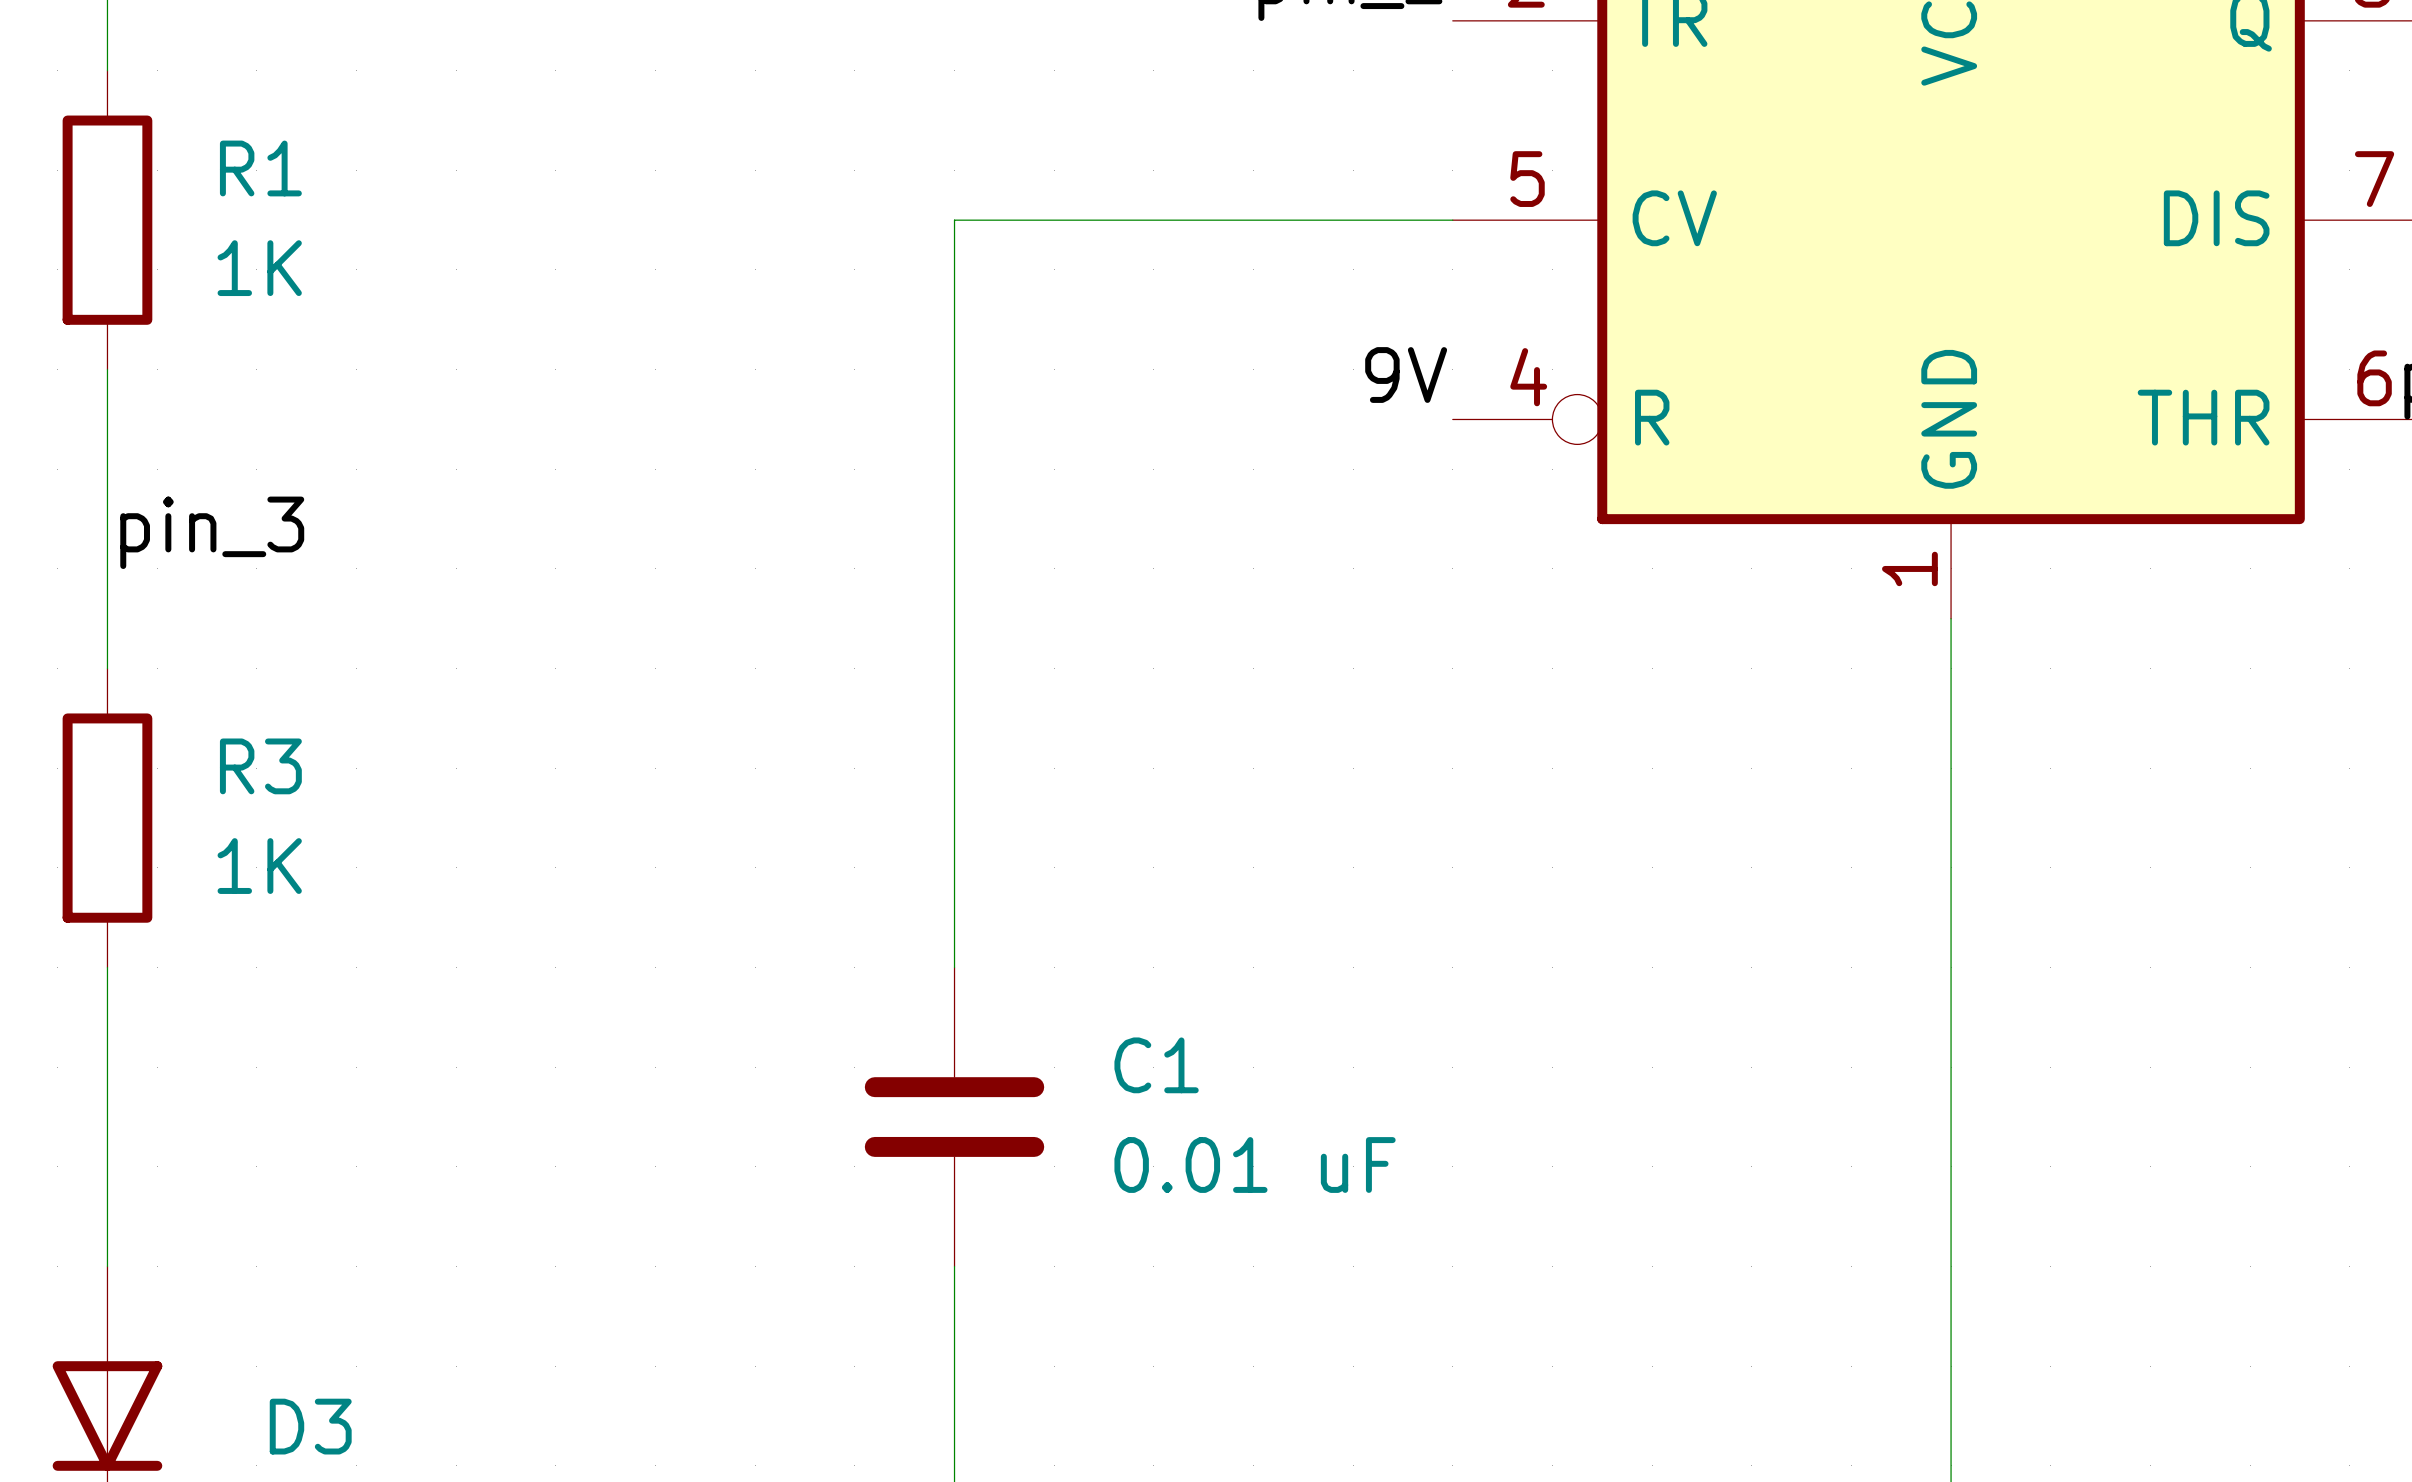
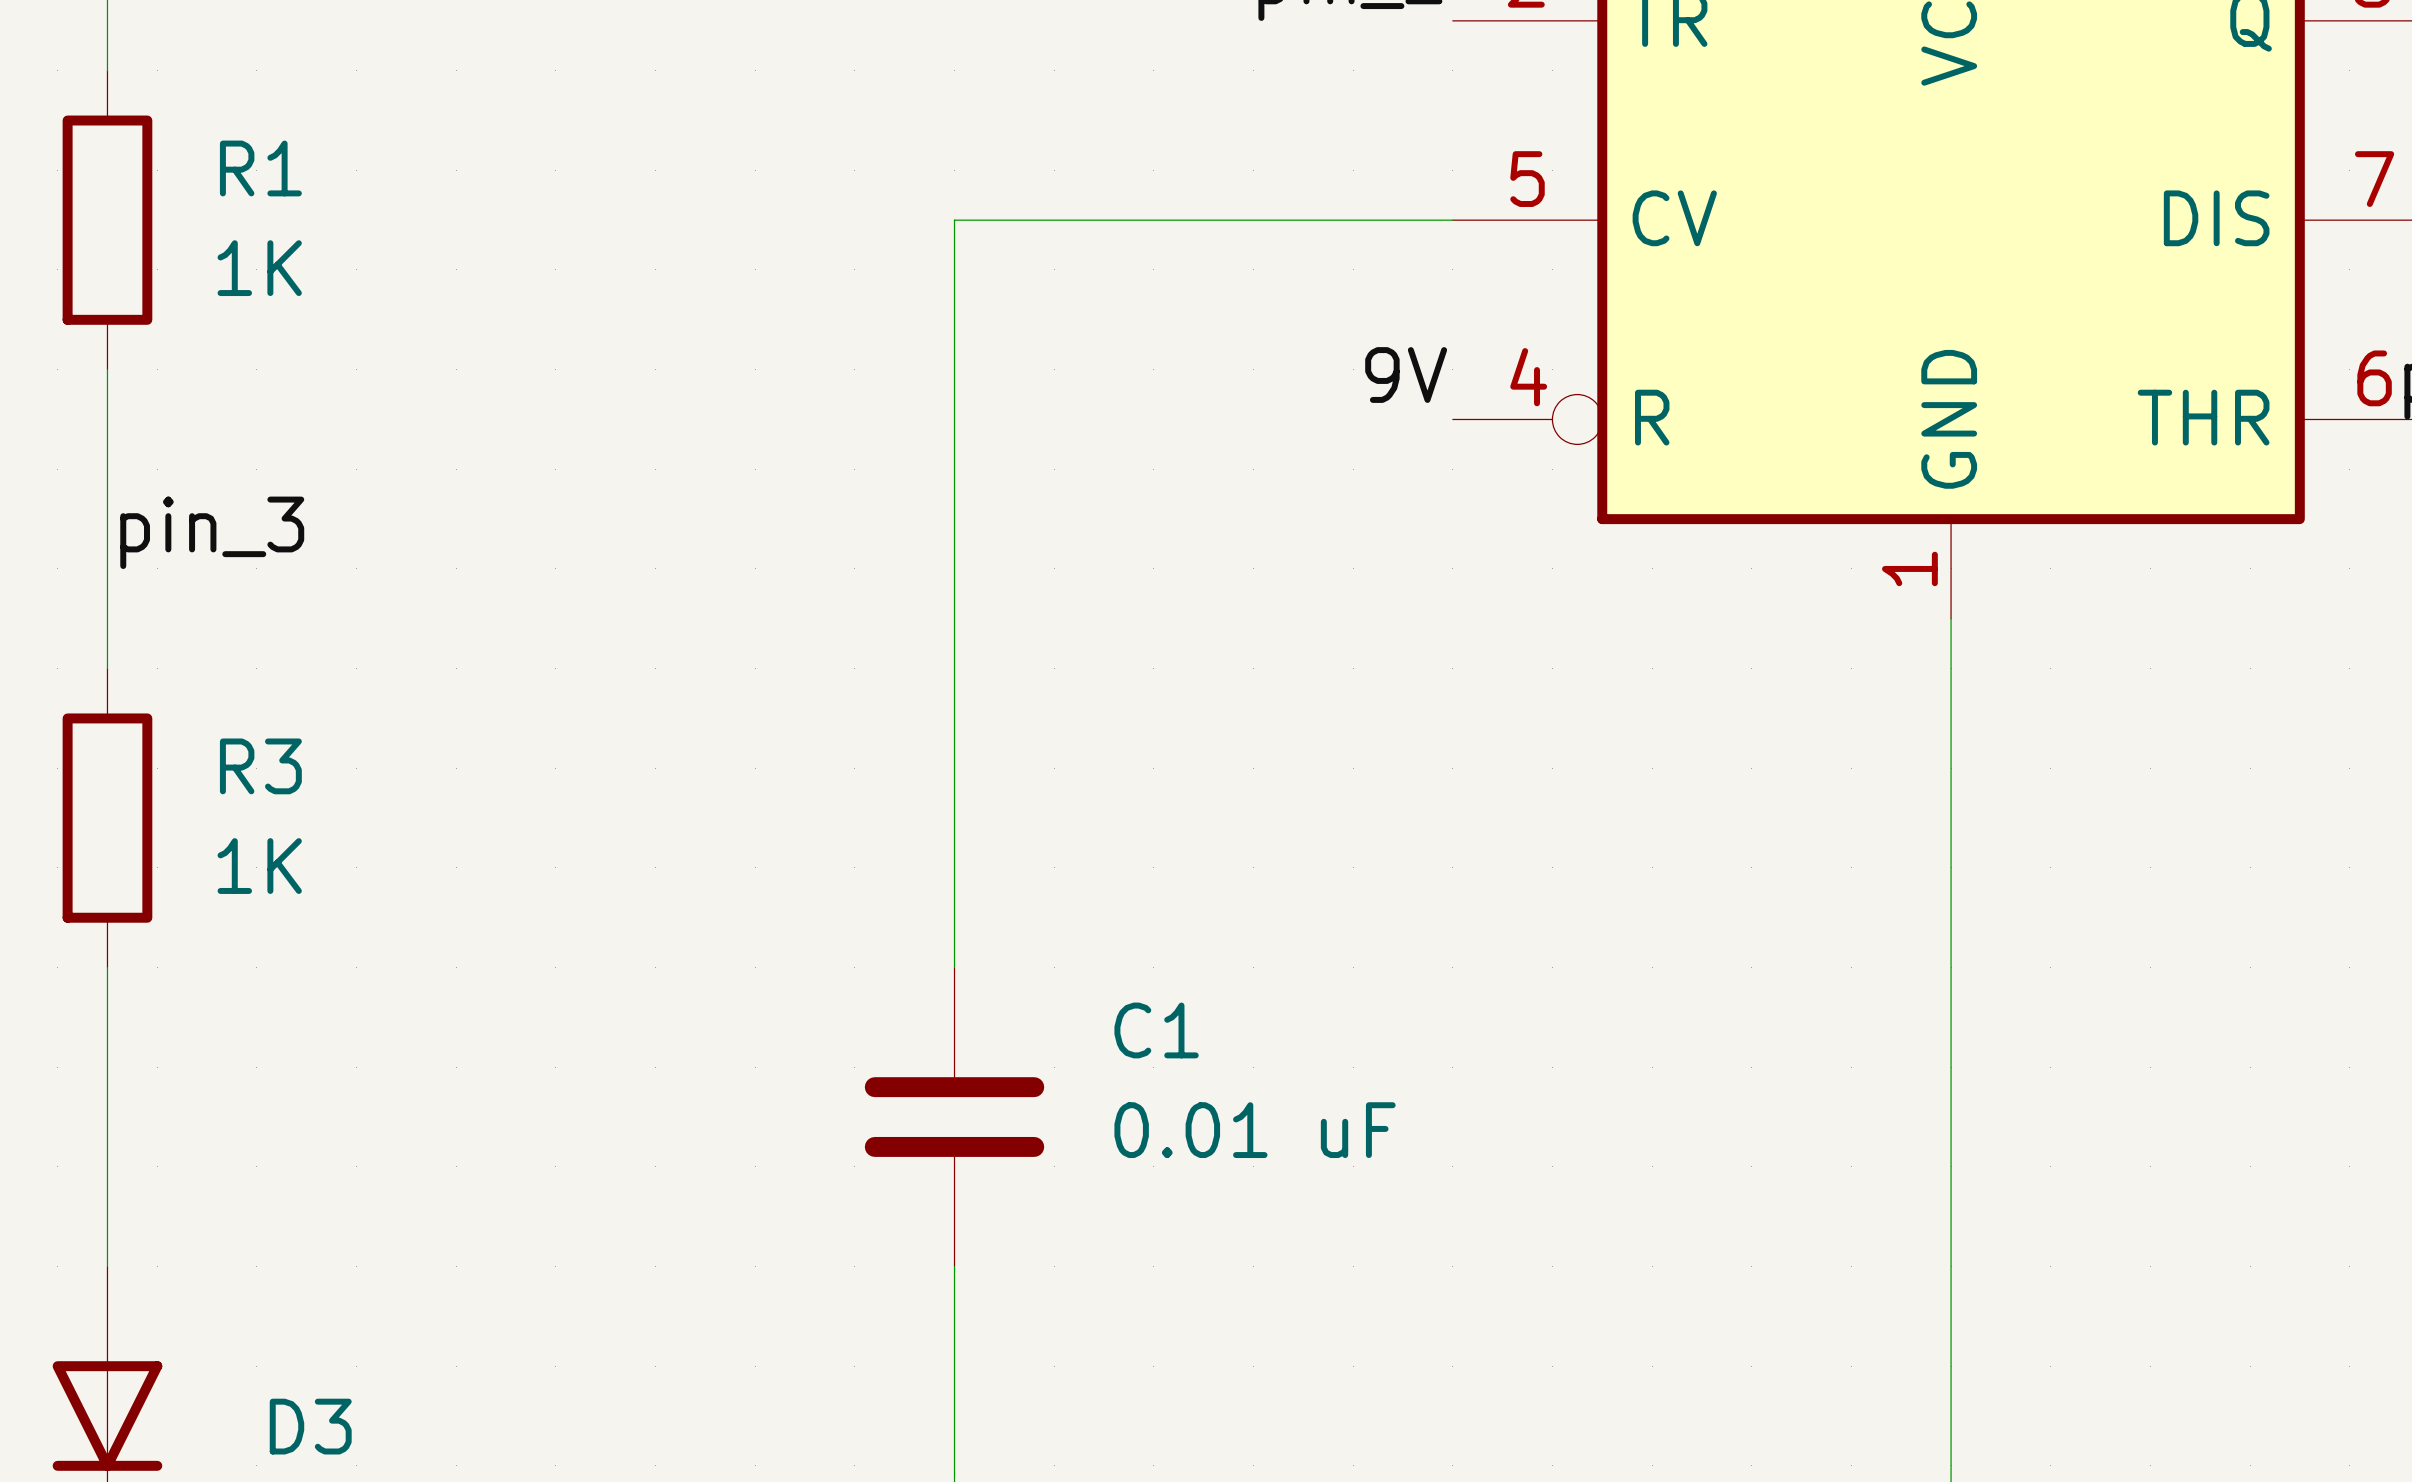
C1 name position: C1 (1156, 1065) -> C1 (1156, 1030)
C1 value position: 0.01 uF (1255, 1165) -> 0.01 uF (1255, 1130)

